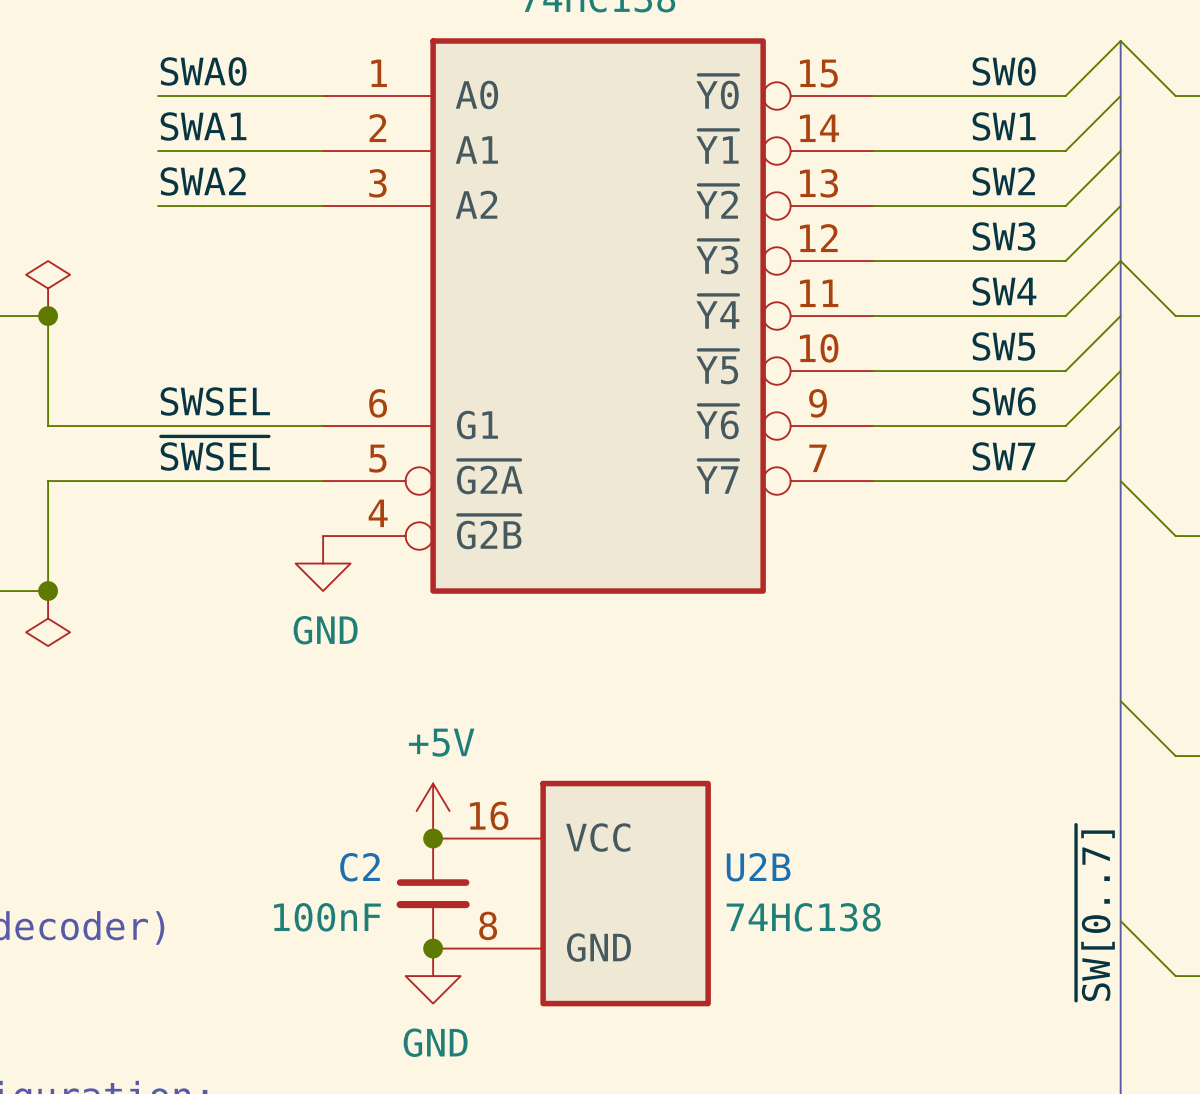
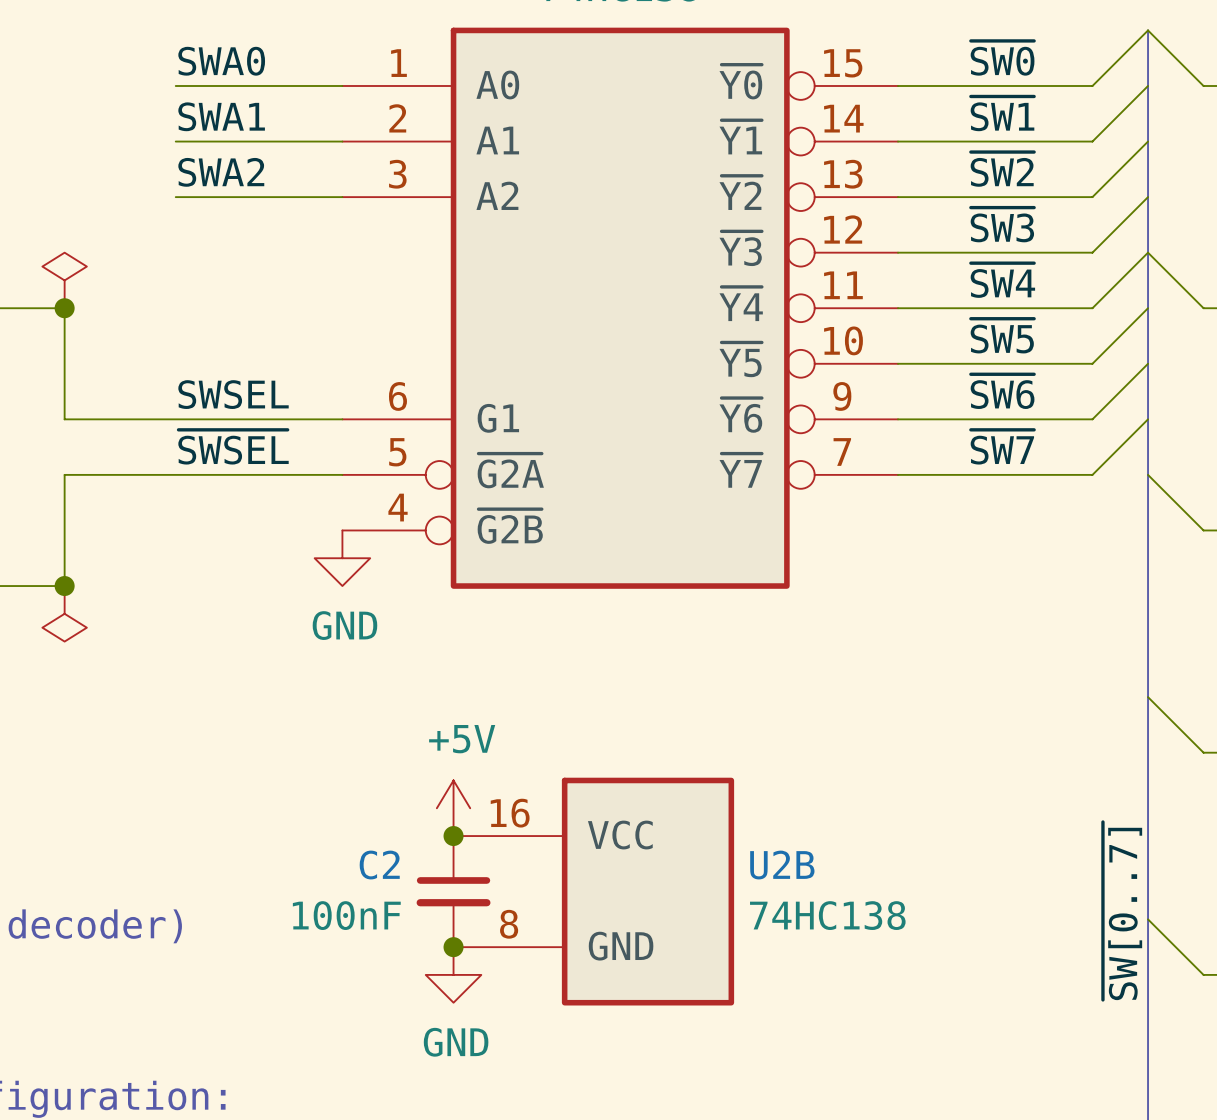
label: SW0 (1004, 71) -> ~{SW0} (1002, 58)
label: SW1 (1004, 126) -> ~{SW1} (1002, 113)
label: SW2 (1003, 181) -> ~{SW2} (1002, 169)
label: SW3 (1003, 236) -> ~{SW3} (1002, 224)
label: SW4 (1004, 291) -> ~{SW4} (1002, 280)
label: SW5 (1003, 346) -> ~{SW5} (1002, 336)
label: SW6 (1004, 401) -> ~{SW6} (1002, 391)
label: SW7 (1003, 456) -> ~{SW7} (1002, 447)

